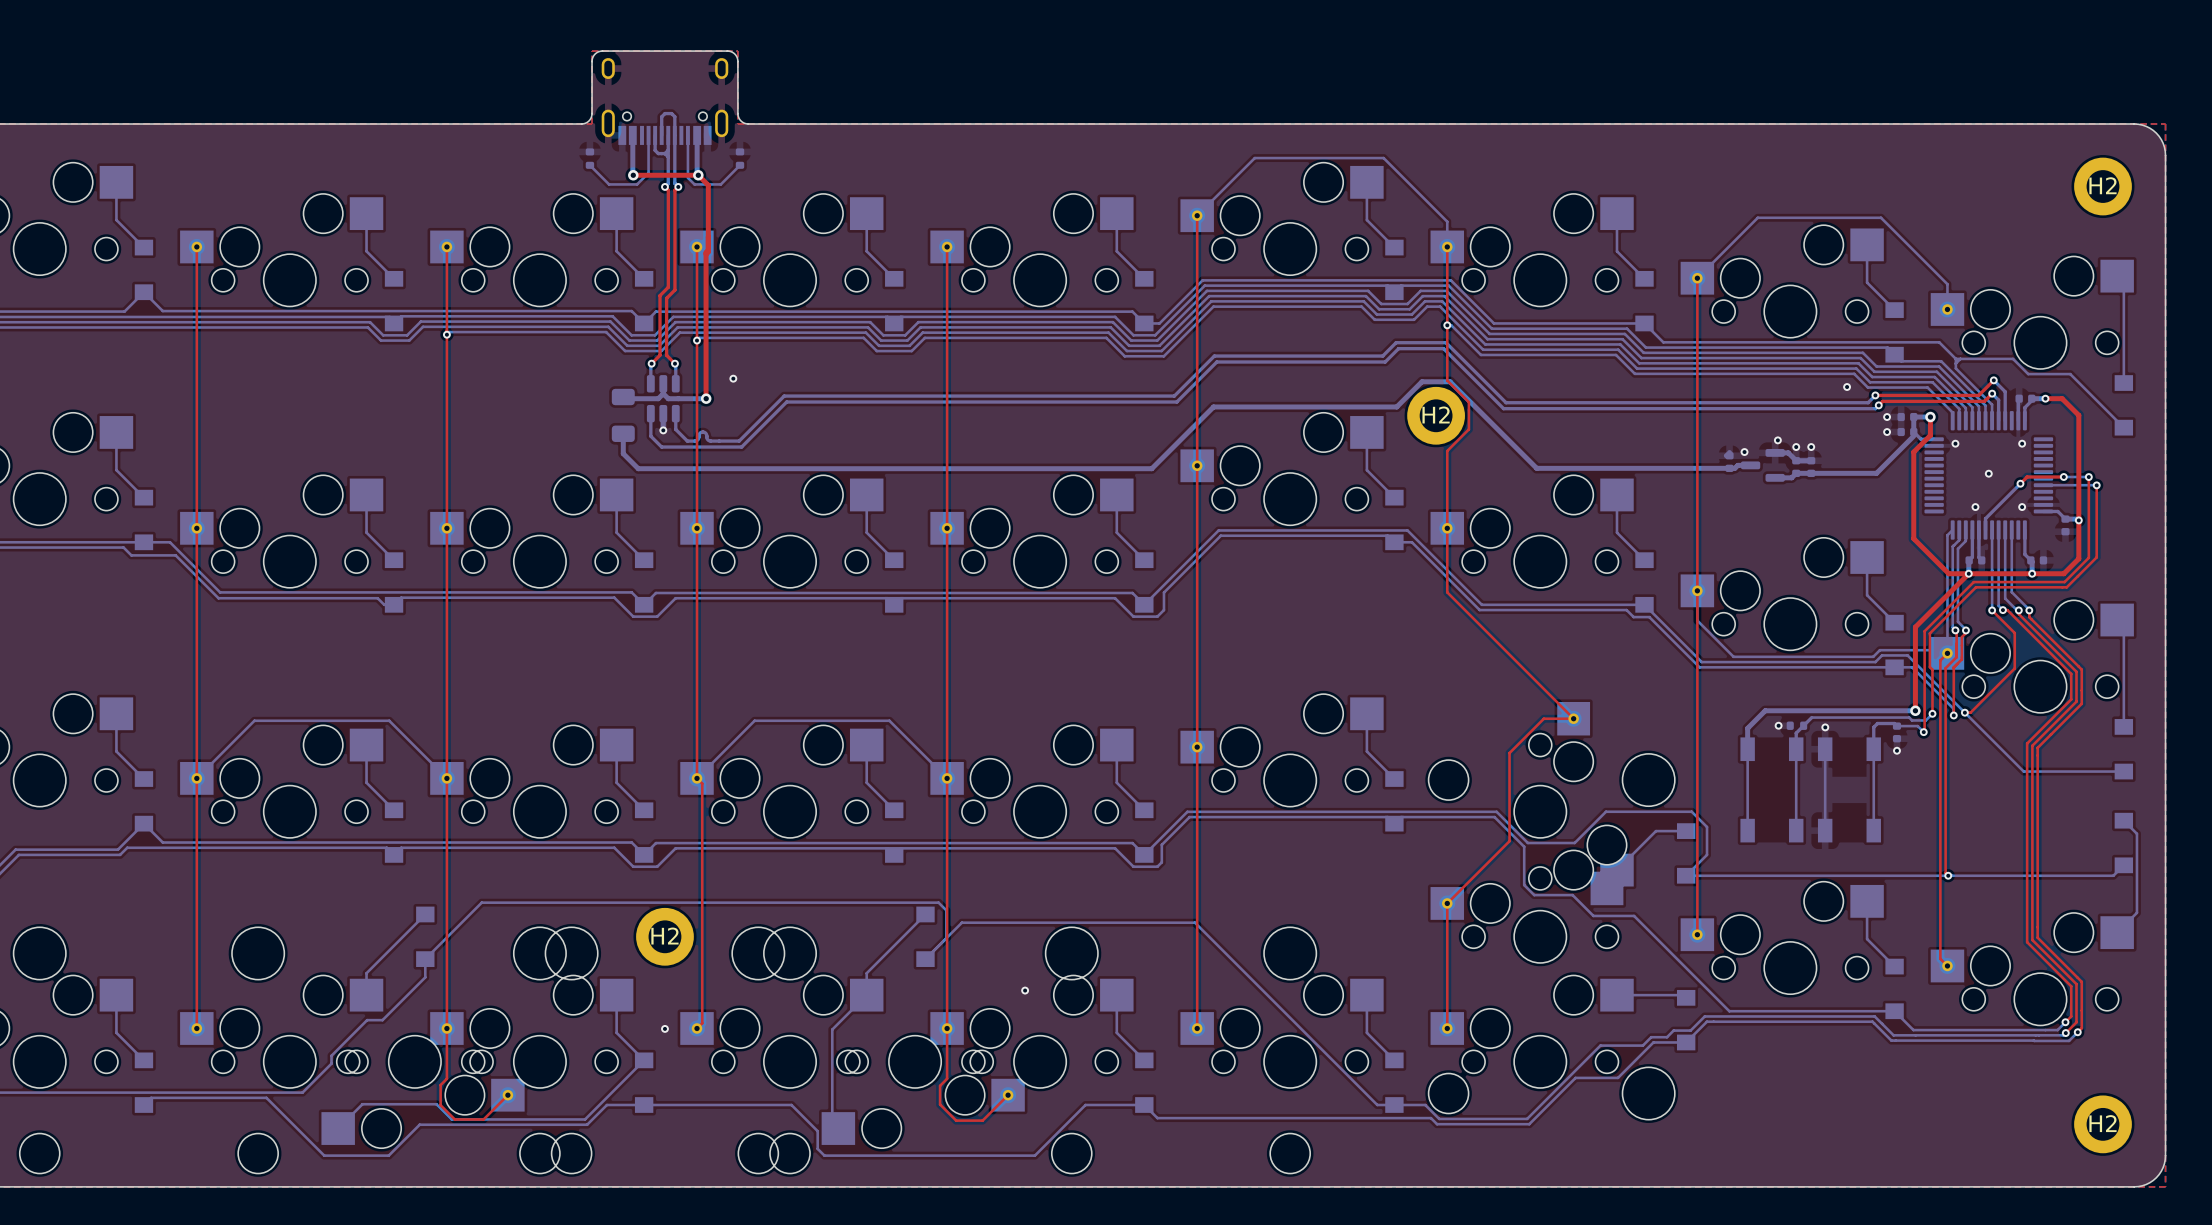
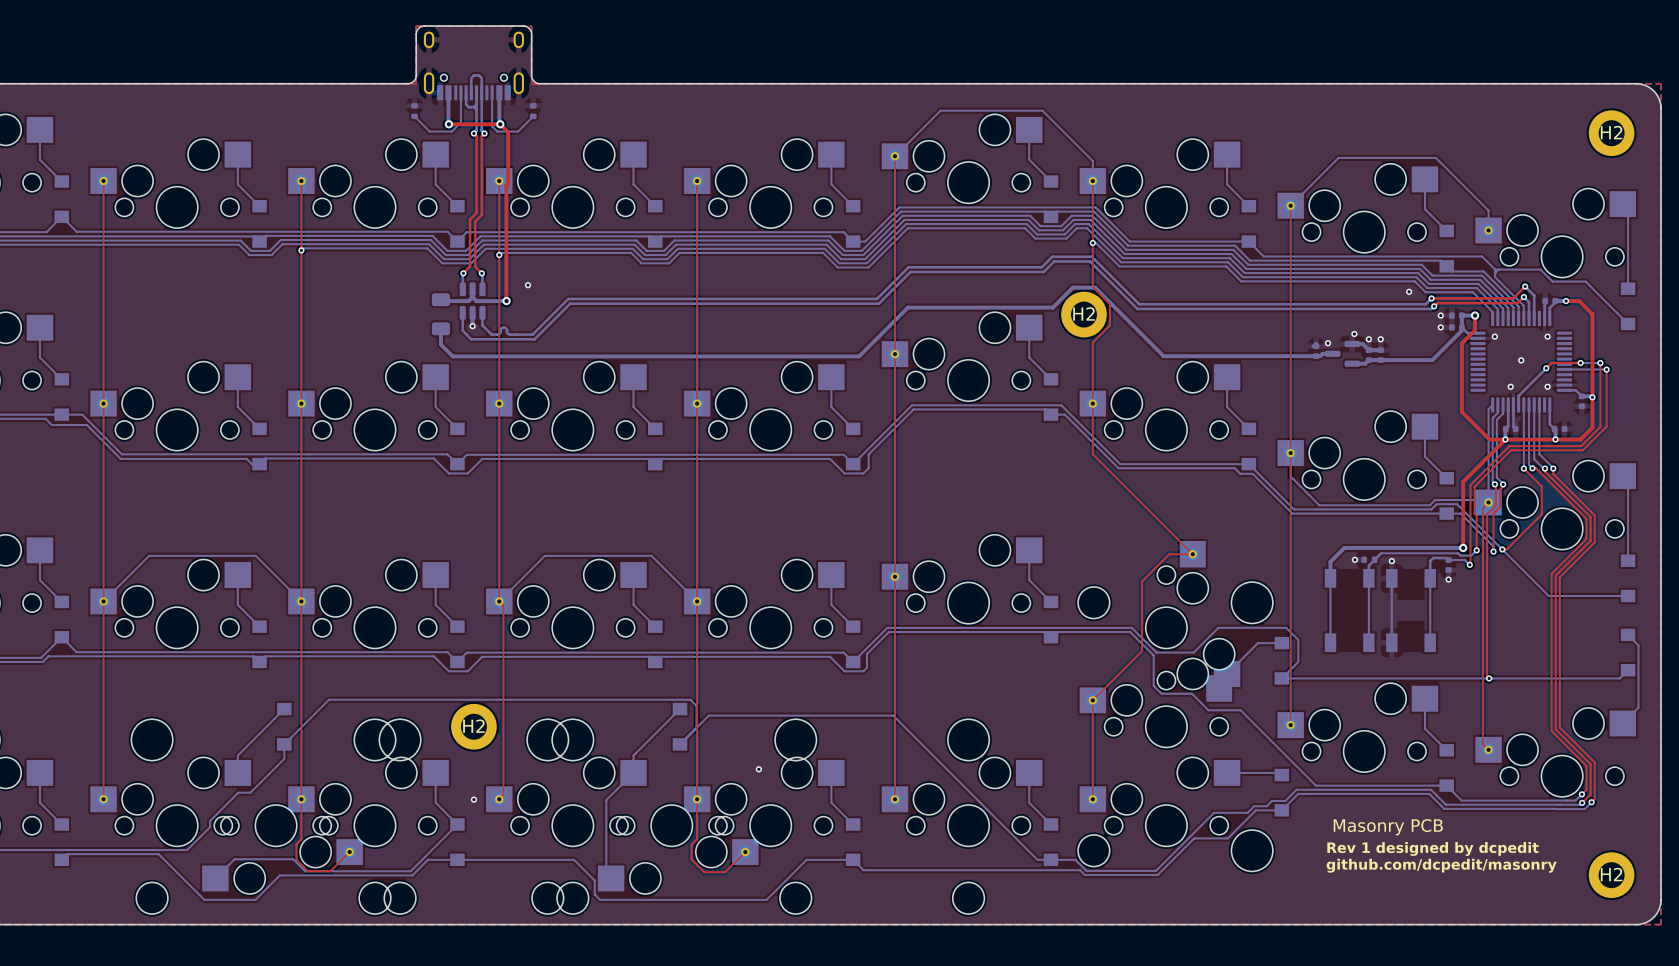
text: none -> Masonry PCB (1388, 827)
text: none -> Rev 1 designed by dcpedit (1432, 848)
text: none -> github.com/dcpedit/masonry (1441, 865)

